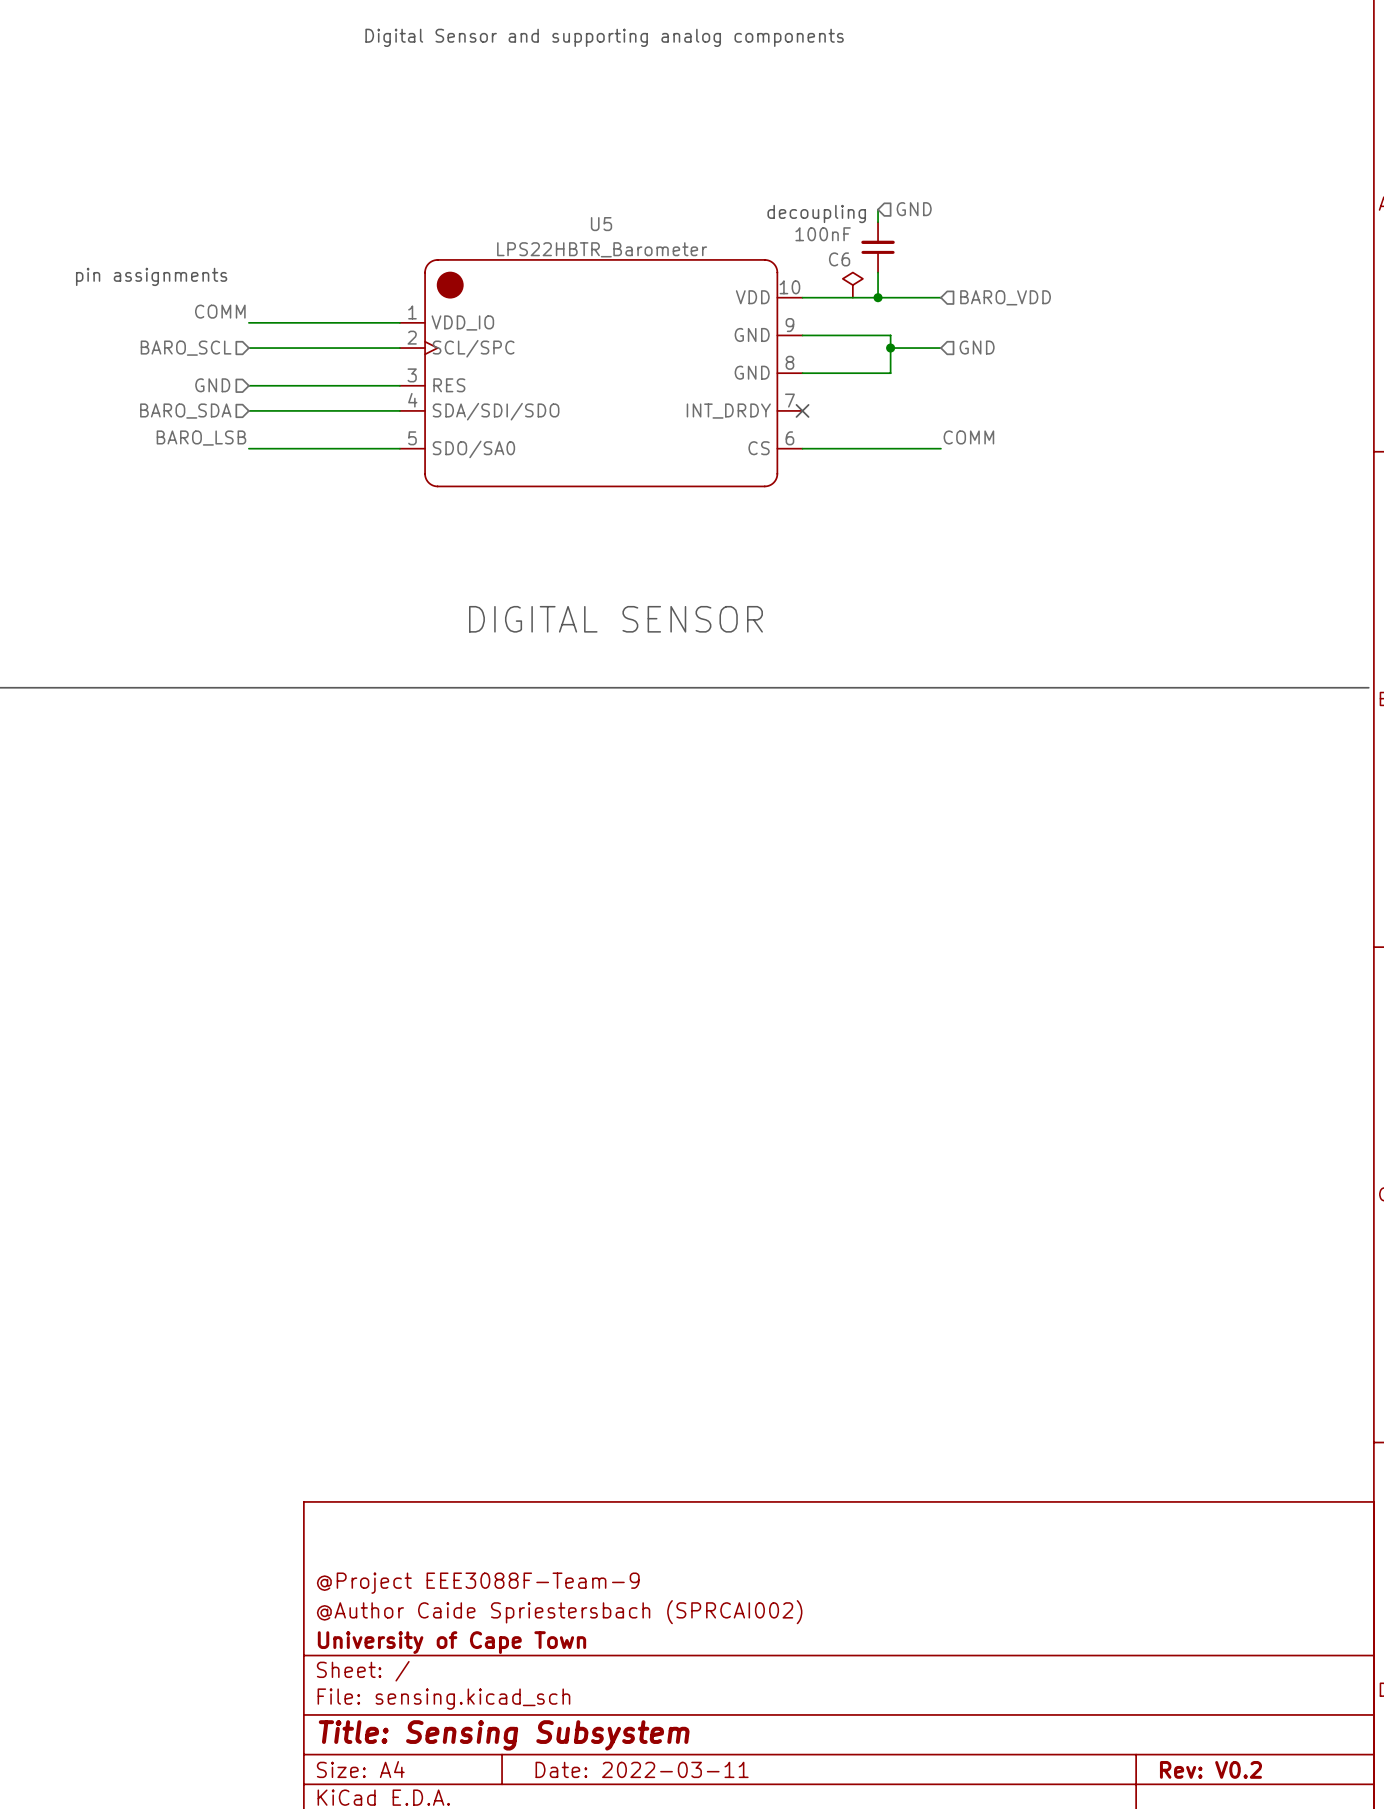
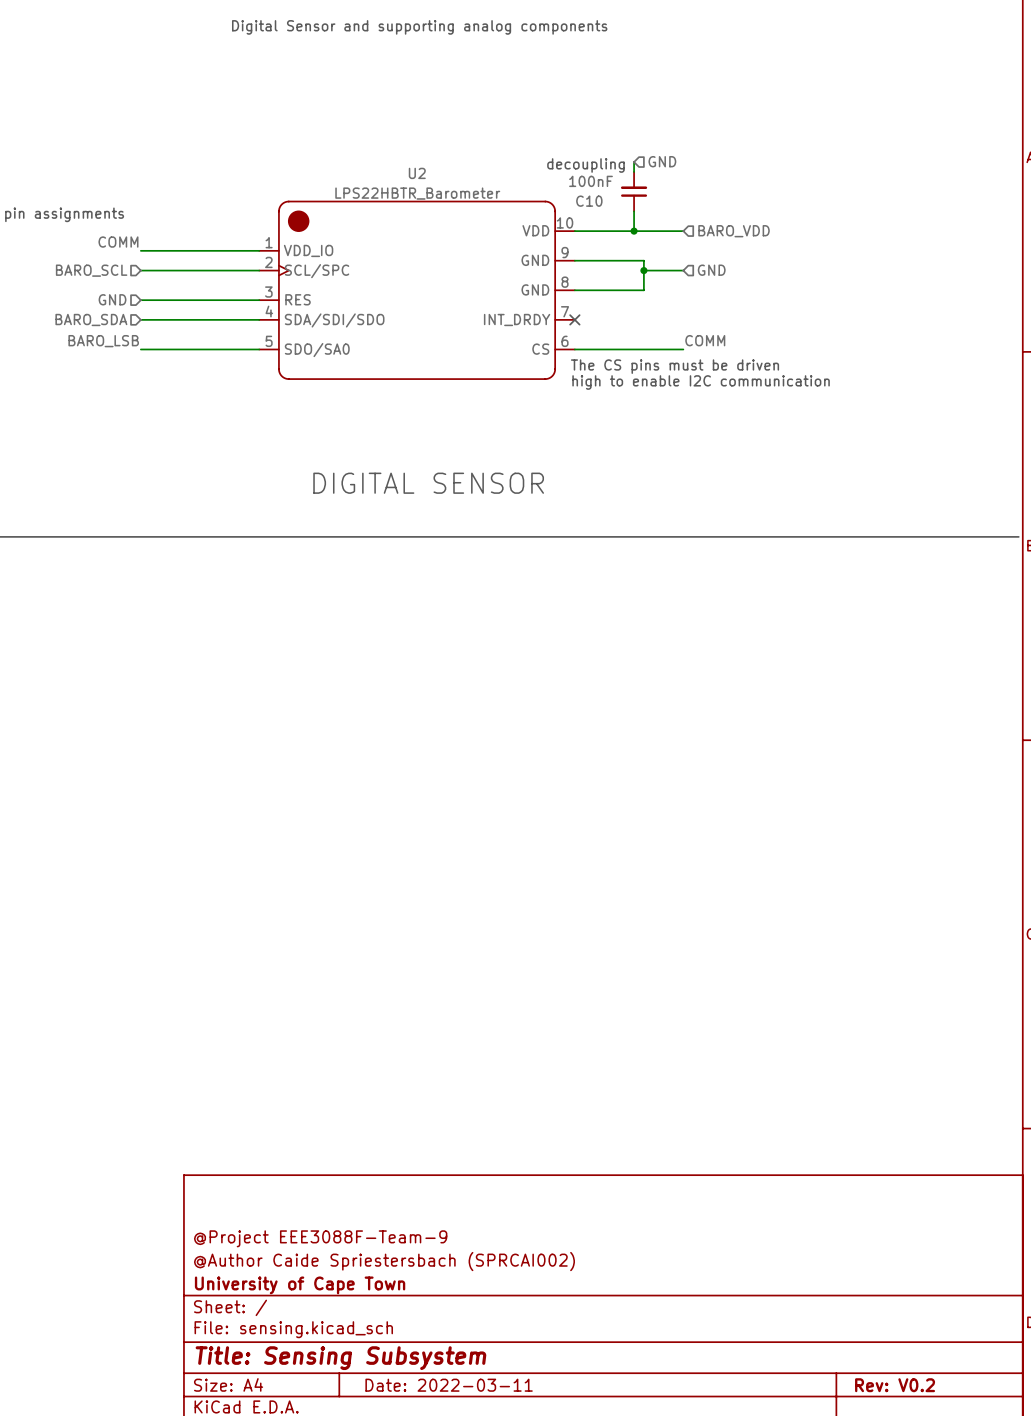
U5 name: U5 (601, 224) -> U2 (417, 173)
C6 name: C6 (839, 259) -> C10 (589, 201)
power symbol: (852, 285) -> none
text: none -> The CS pins must be driven (674, 366)
text: none -> high to enable I2C communication (701, 382)

